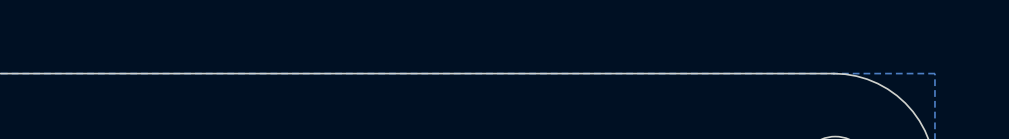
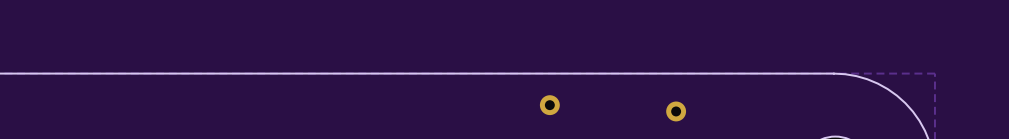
via: none -> (549, 105)
via: none -> (676, 111)

